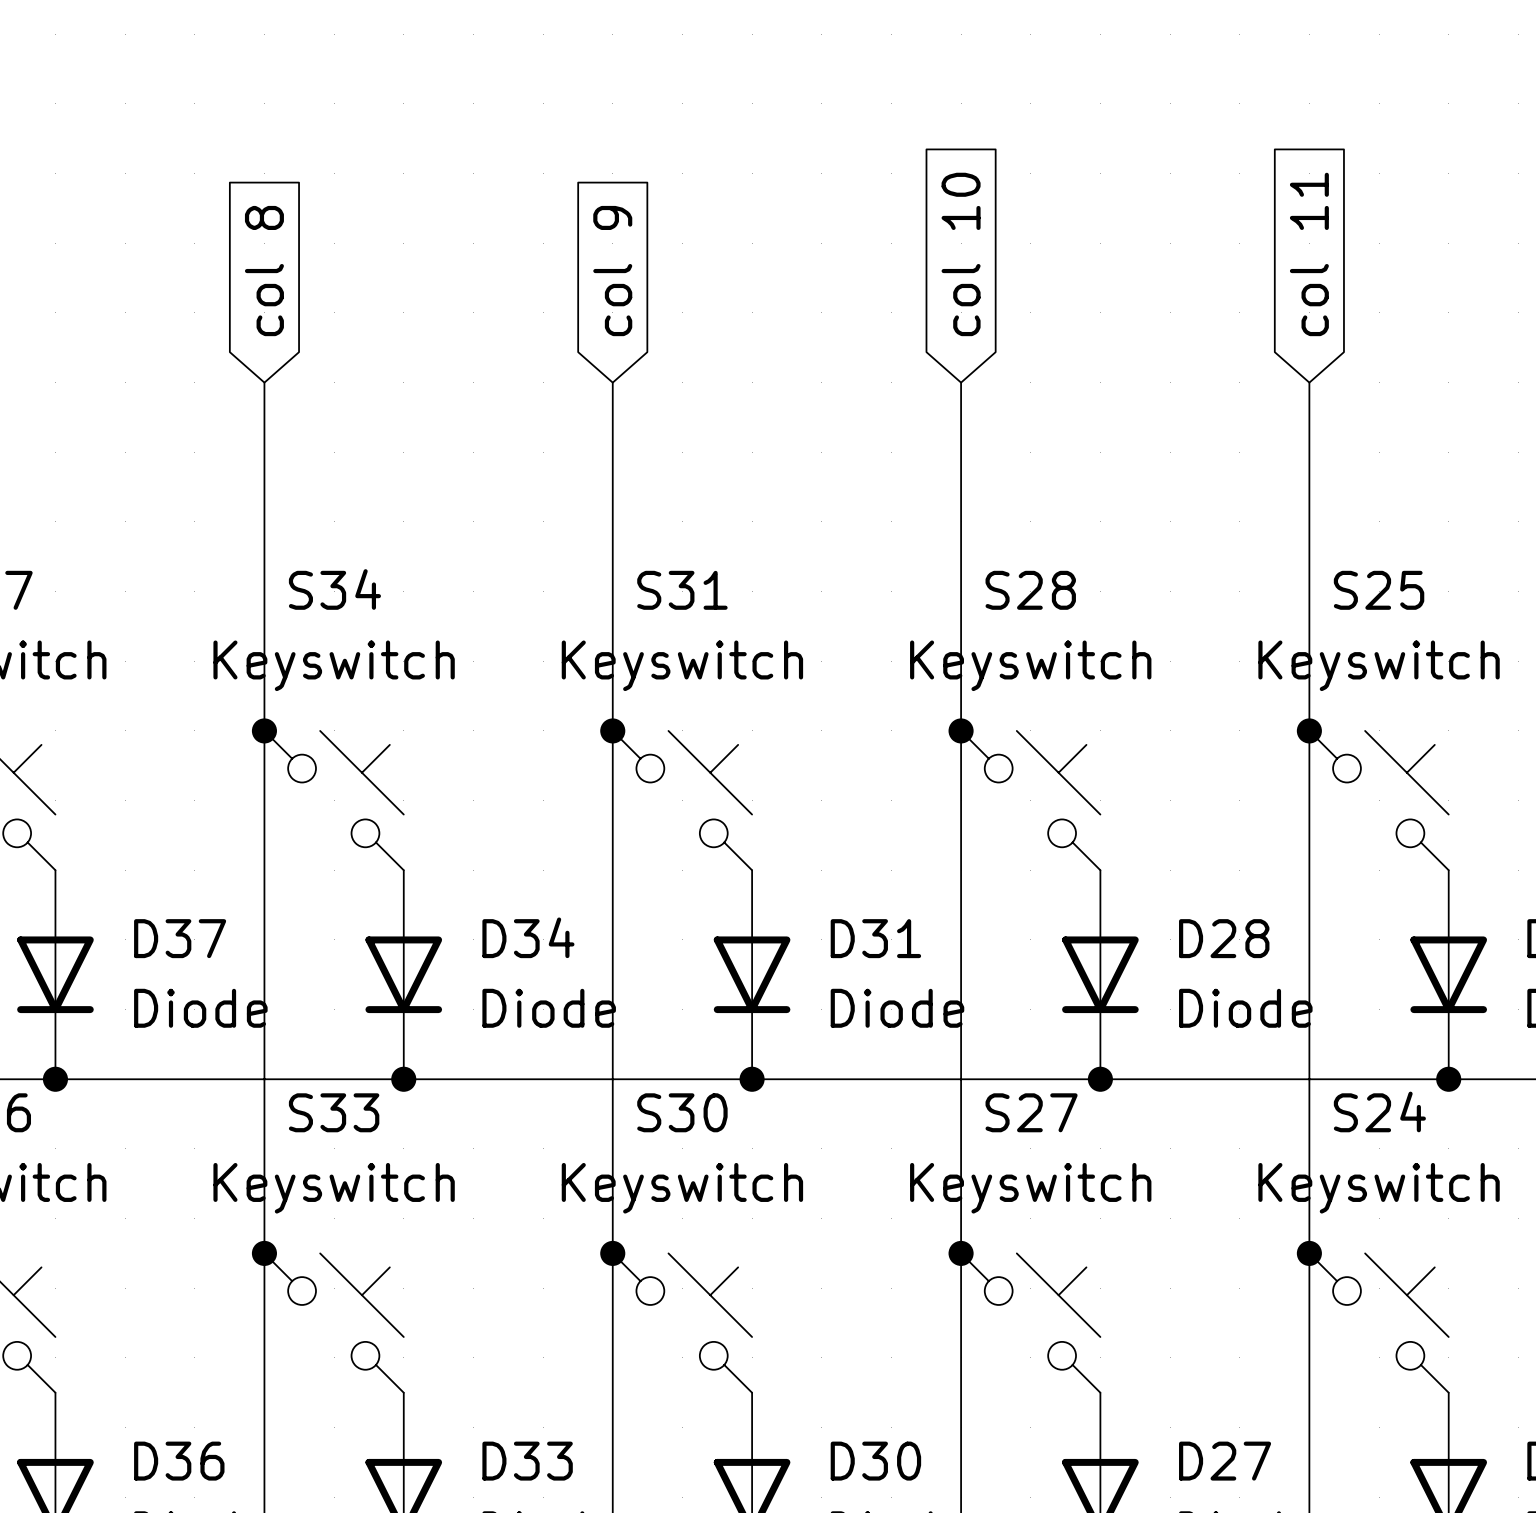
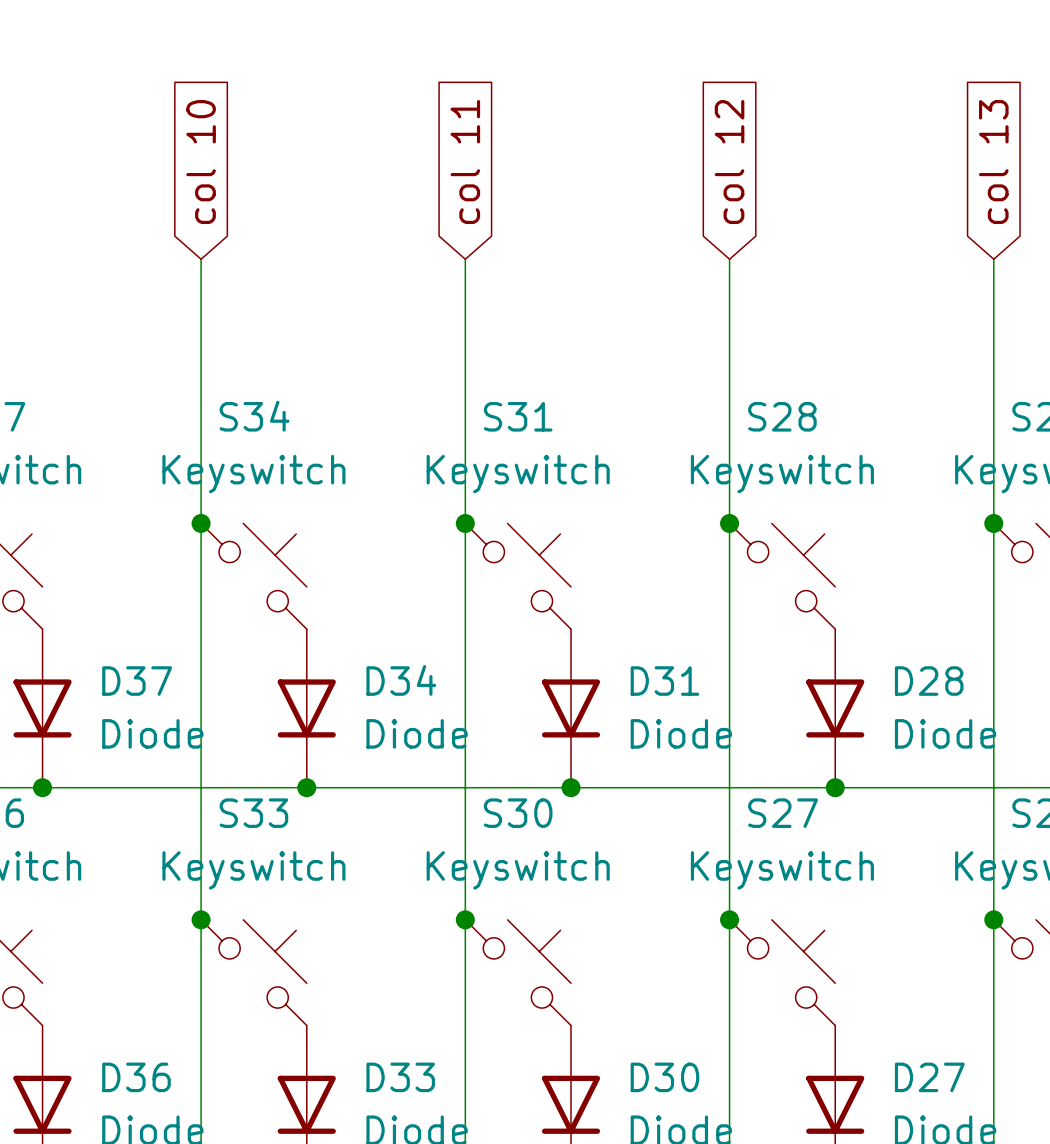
global label: col 10 (961, 254) -> col 12 (729, 162)
global label: col 11 (1309, 254) -> col 13 (993, 162)
global label: col 8 (264, 271) -> col 10 (201, 162)
global label: col 9 (612, 271) -> col 11 (465, 162)

